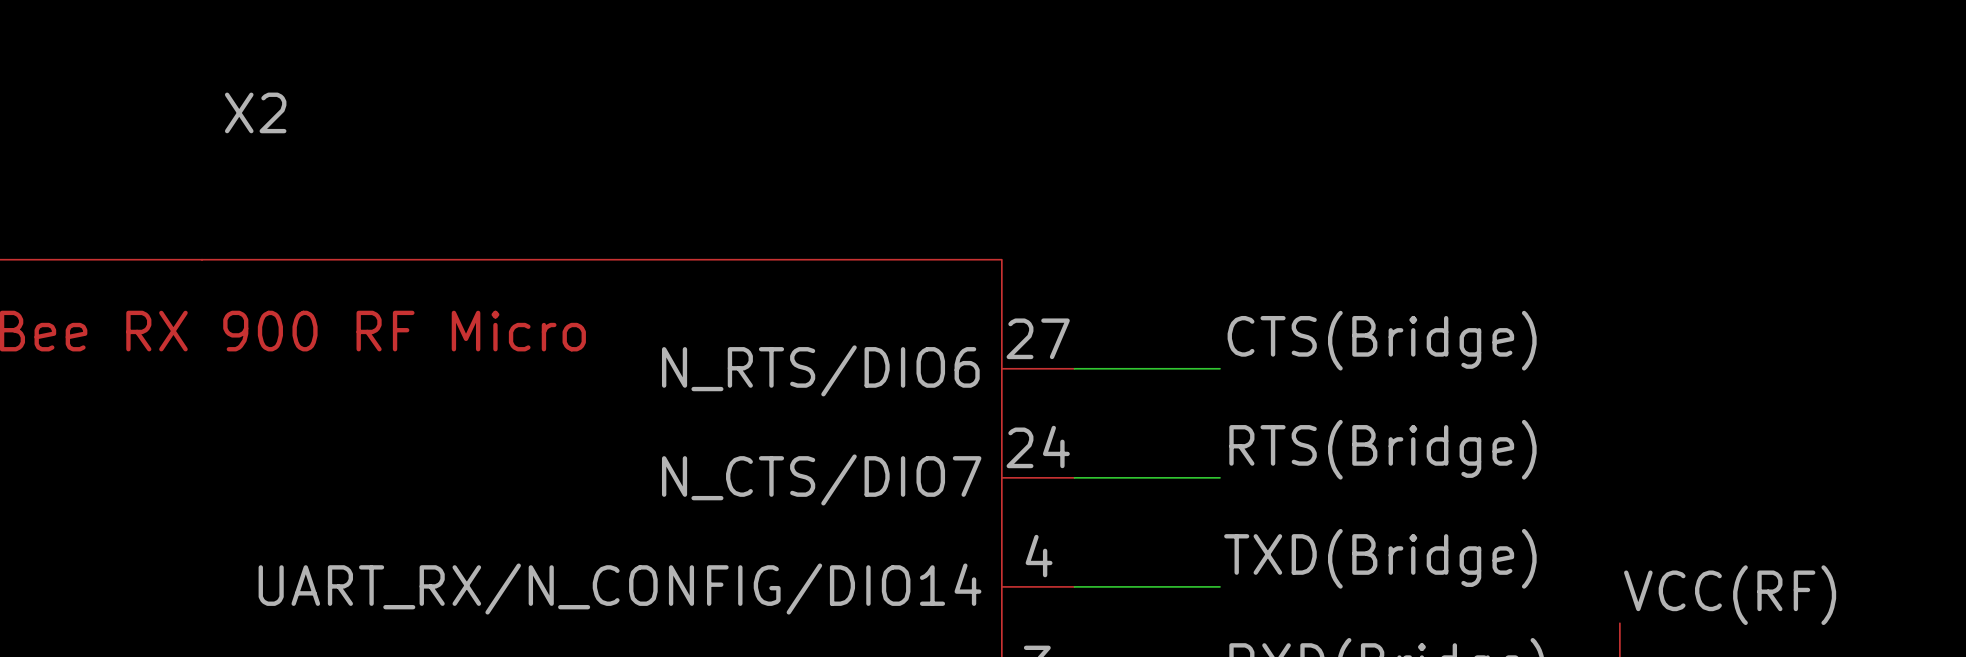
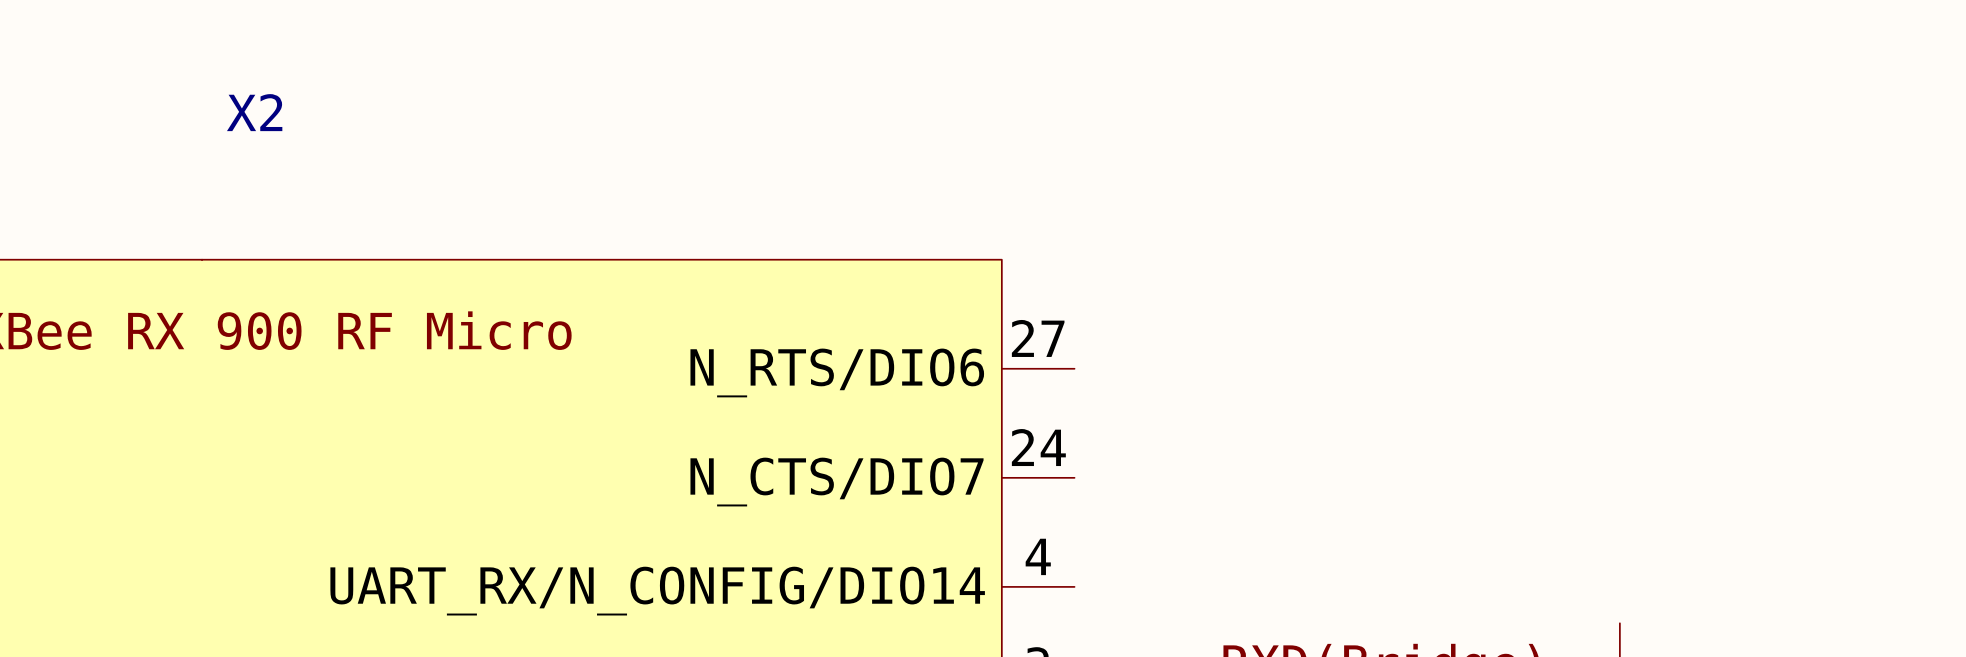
label: CTS(Bridge) (1382, 340) -> none
wire: (1074, 368) (1219, 368) -> none
label: RTS(Bridge) (1382, 449) -> none
wire: (1074, 477) (1219, 477) -> none
label: TXD(Bridge) (1380, 558) -> none
wire: (1074, 586) (1219, 586) -> none
label: VCC(RF) (1730, 595) -> none

